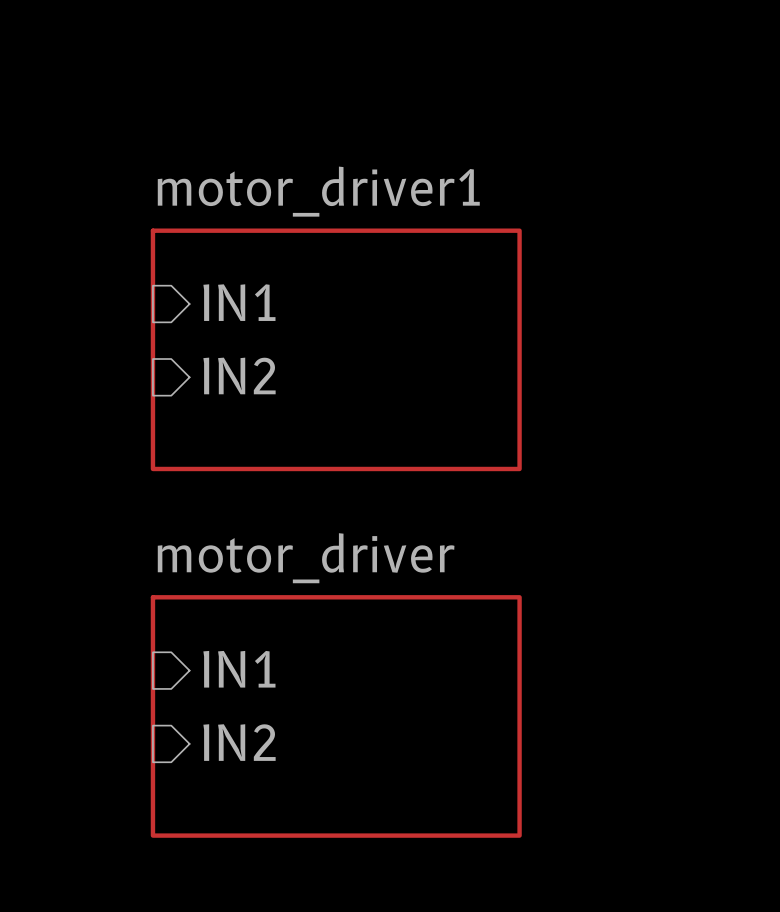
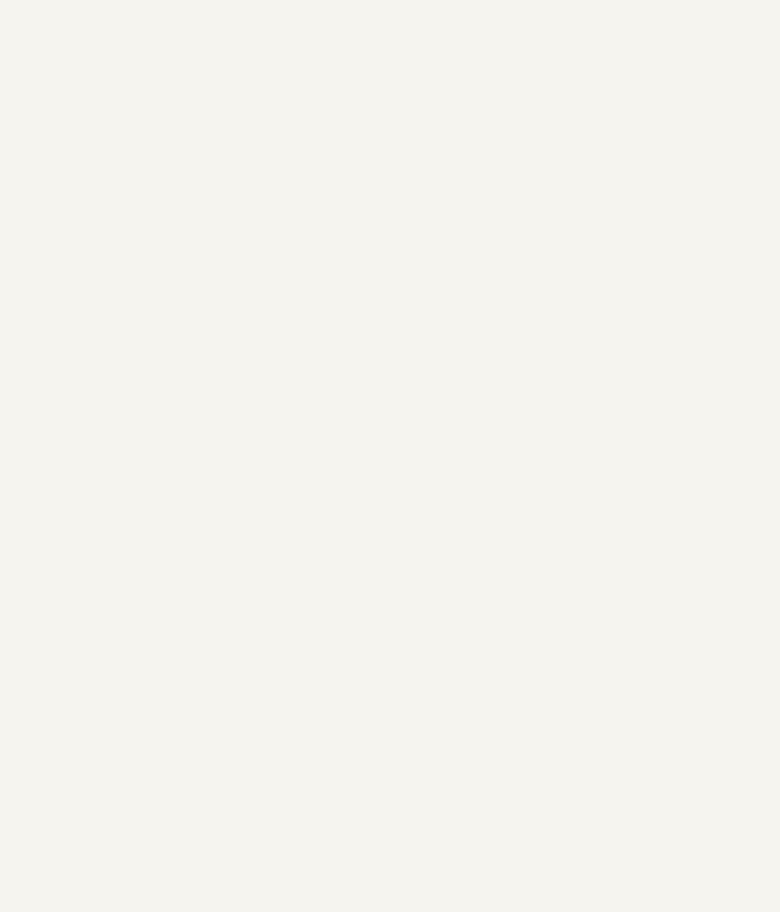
sheet pin: IN1 (239, 302) -> none
sheet motor_driver1: (336, 349) -> none
sheet pin: IN2 (239, 375) -> none
sheet pin: IN1 (239, 669) -> none
sheet motor_driver: (336, 716) -> none
sheet pin: IN2 (239, 742) -> none

